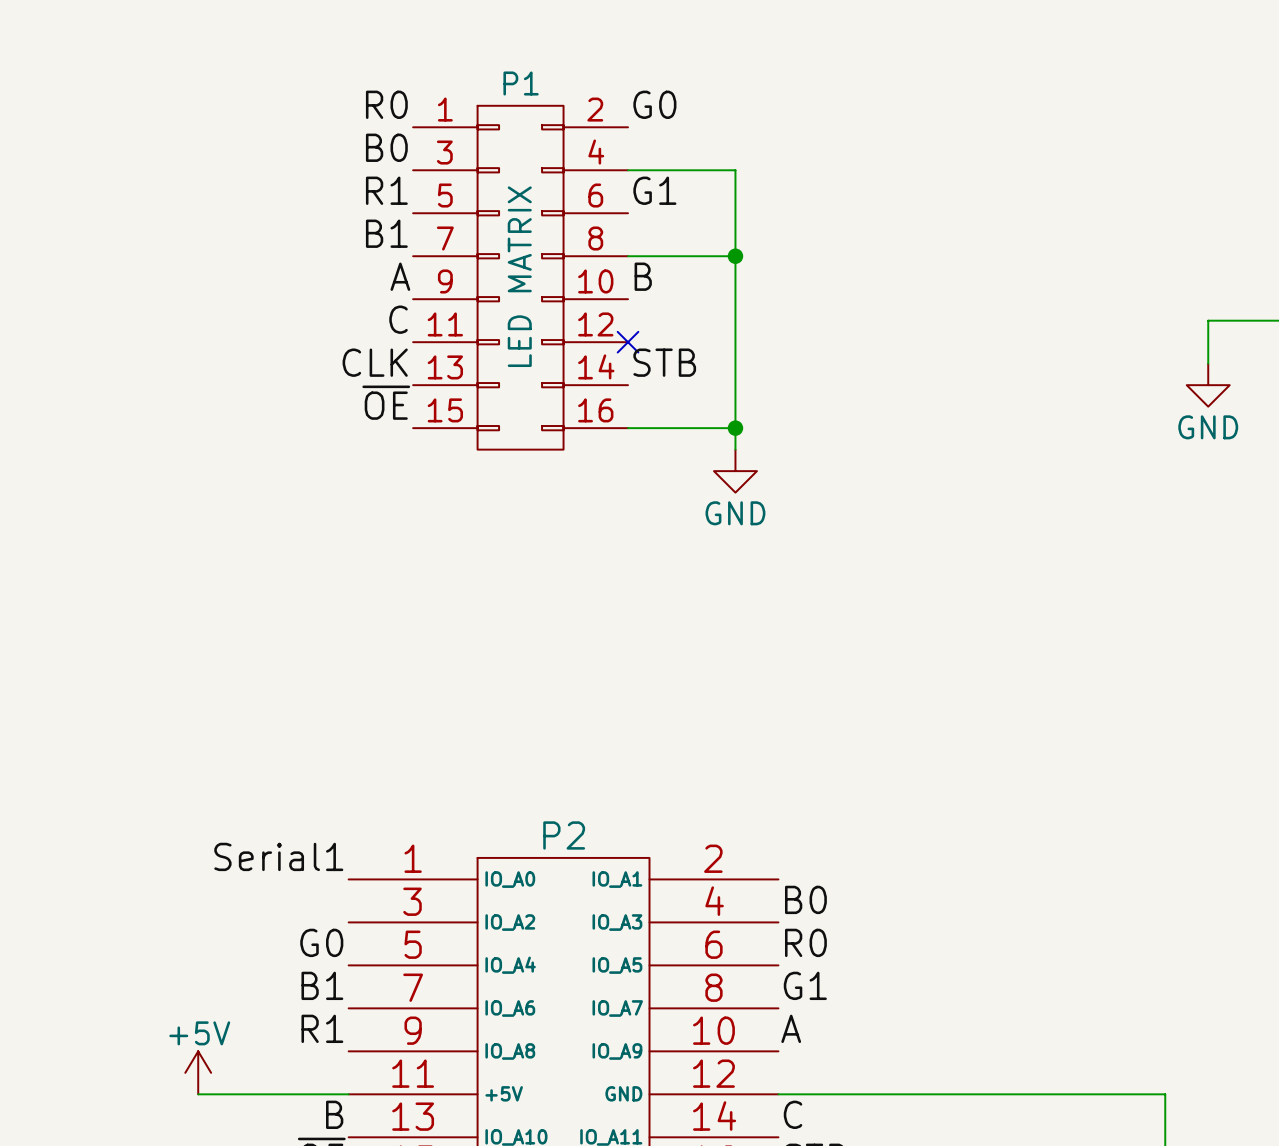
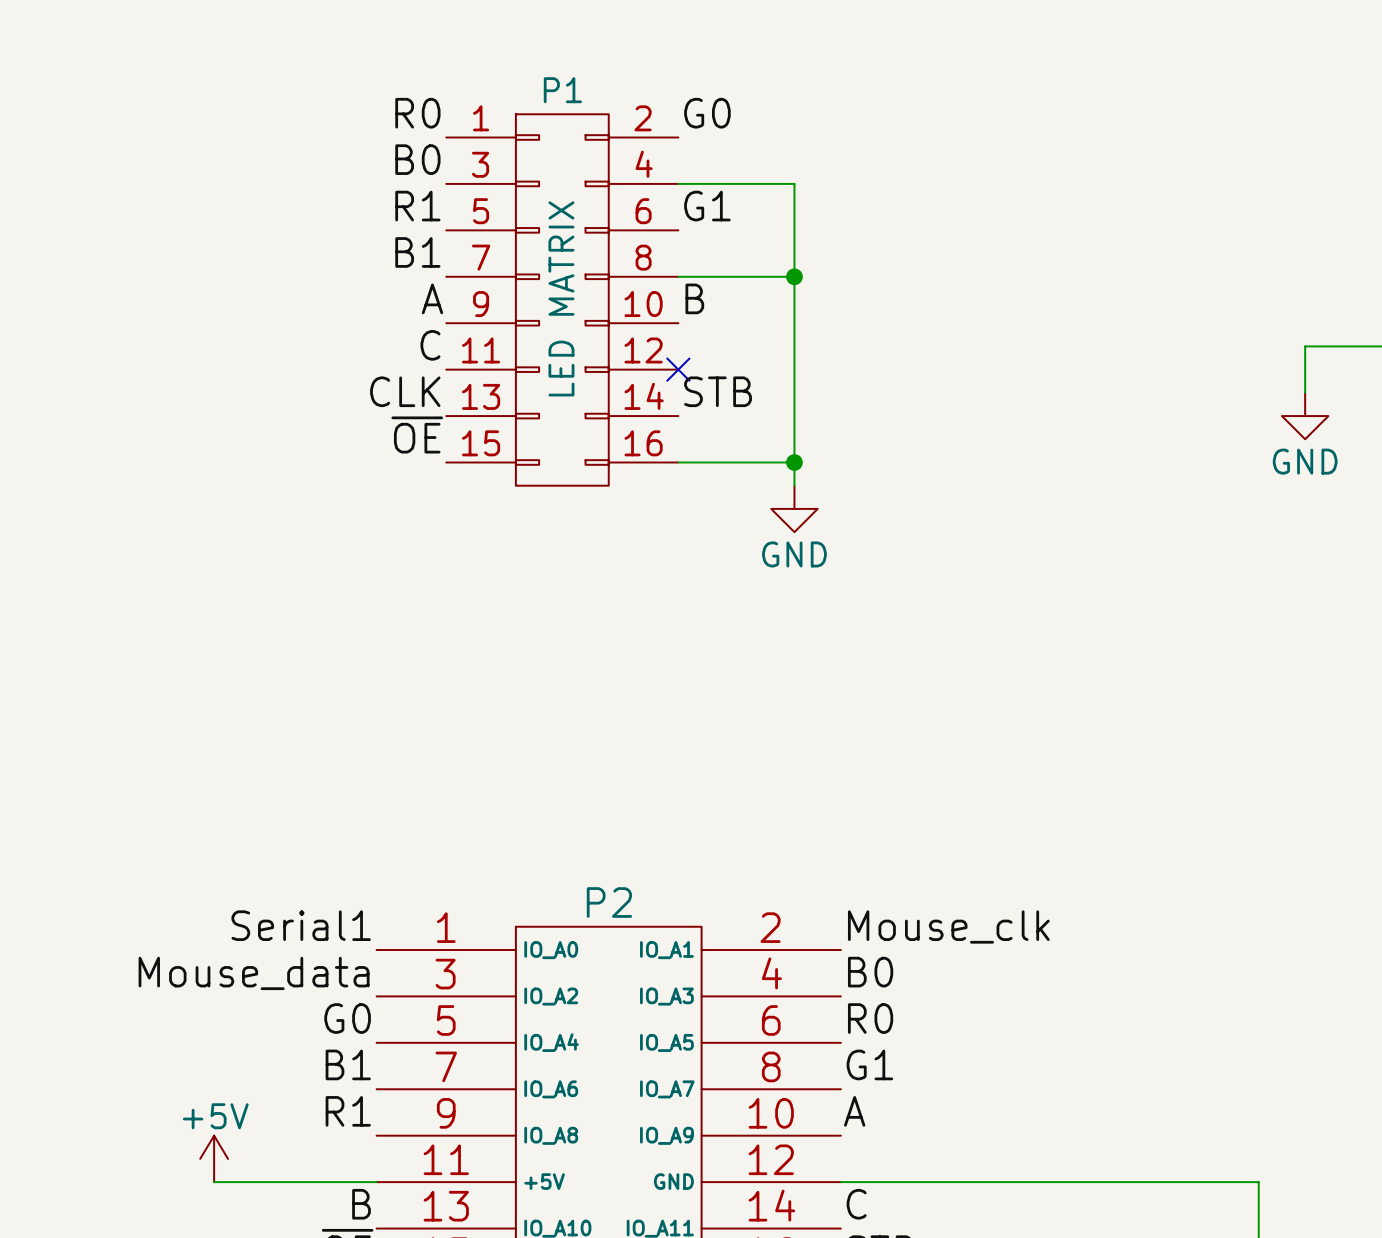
label: none -> Mouse_clk (948, 927)
label: none -> Mouse_data (254, 973)

